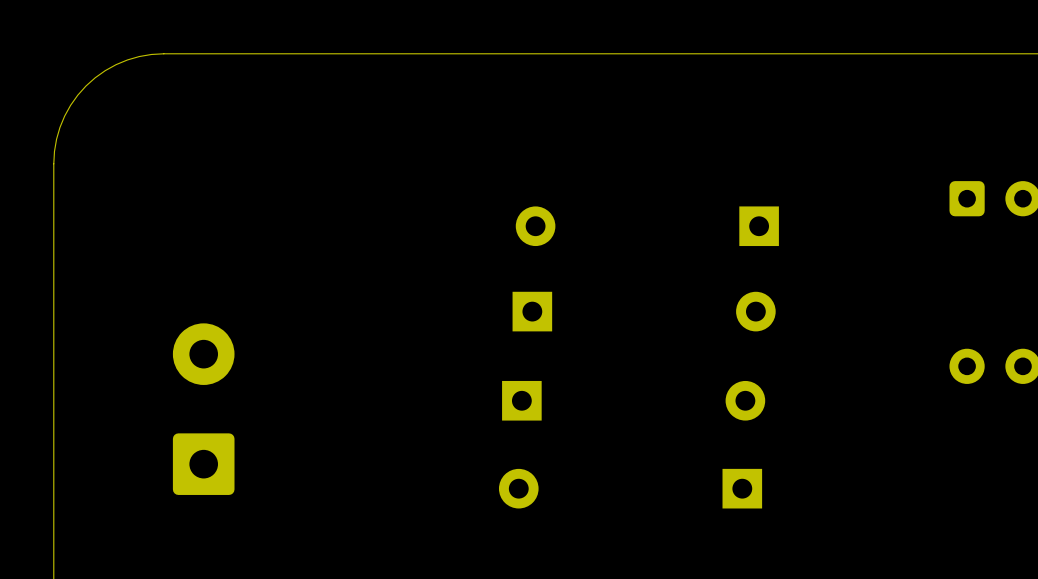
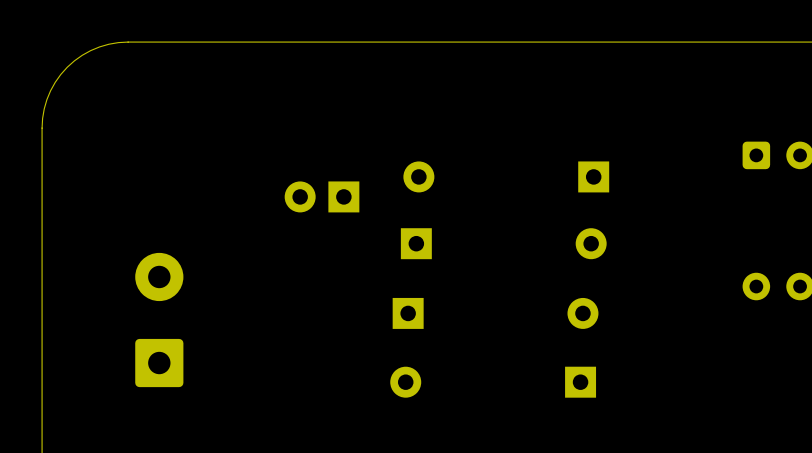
part: none -> (322, 196)

